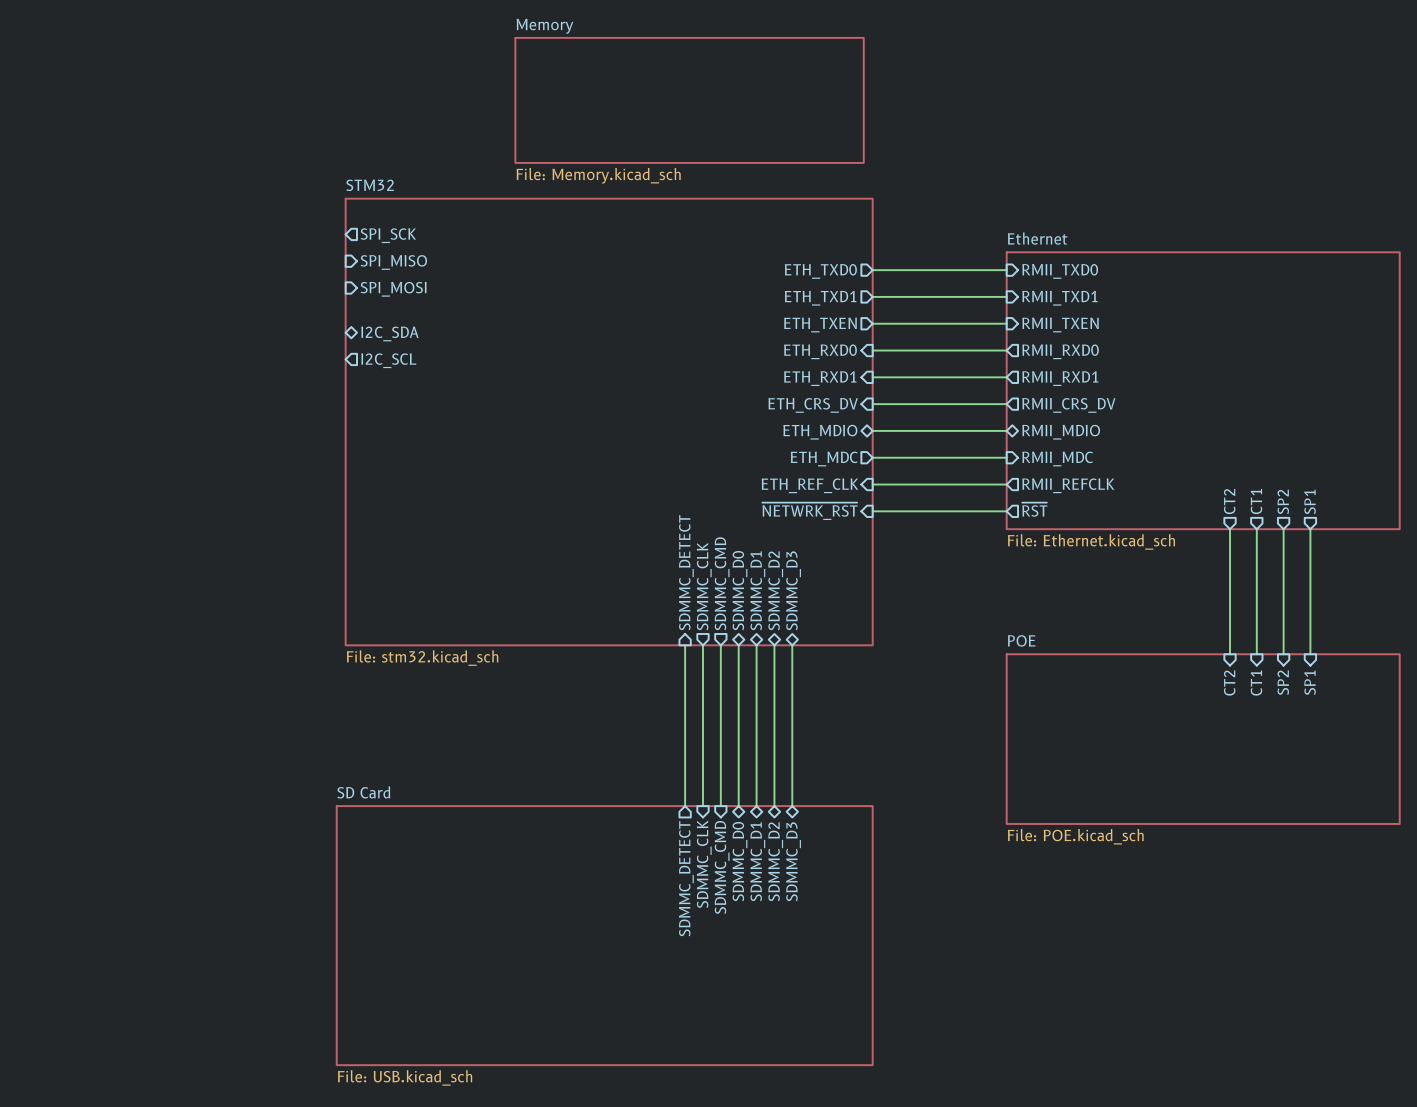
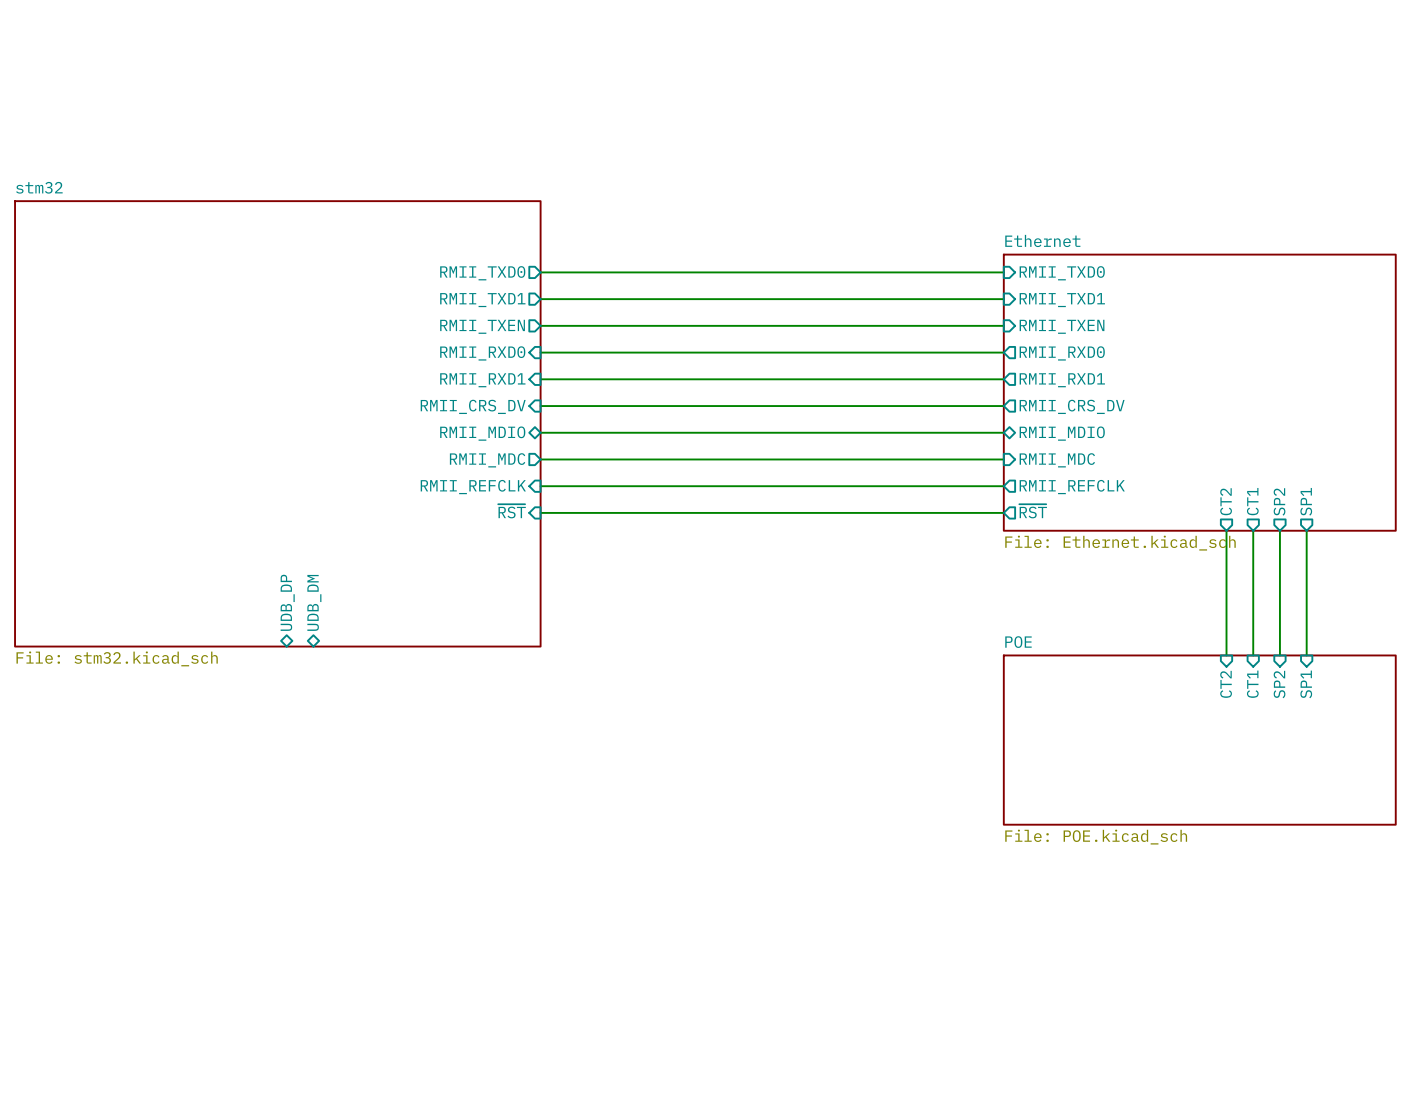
sheet Memory: File: Memory.kicad_sch (689, 100) -> none
sheet pin: SPI_SCK (388, 235) -> none
sheet pin: SPI_MISO (393, 262) -> none
wire: none -> (540, 272) (870, 272)
sheet pin: none -> RMII_TXD0 (482, 273)
sheet pin: ETH_TXD0 (820, 271) -> none
sheet pin: SPI_MOSI (393, 289) -> none
wire: none -> (540, 299) (870, 299)
sheet pin: none -> RMII_TXD1 (482, 300)
sheet pin: ETH_TXD1 (820, 298) -> none
wire: none -> (540, 325) (870, 325)
sheet pin: none -> RMII_TXEN (482, 326)
sheet pin: ETH_TXEN (820, 325) -> none
sheet pin: I2C_SDA (389, 333) -> none
wire: none -> (540, 352) (870, 352)
sheet pin: none -> RMII_RXD0 (482, 353)
sheet pin: ETH_RXD0 (820, 351) -> none
sheet pin: I2C_SCL (388, 360) -> none
wire: none -> (540, 379) (870, 379)
sheet pin: none -> RMII_RXD1 (482, 380)
sheet pin: ETH_RXD1 (820, 378) -> none
wire: none -> (540, 406) (870, 406)
sheet pin: none -> RMII_CRS_DV (473, 406)
sheet pin: ETH_CRS_DV (813, 405) -> none
sheet stm32: none -> File: stm32.kicad_sch (277, 423)
sheet STM32: File: stm32.kicad_sch (609, 422) -> none
wire: none -> (540, 432) (870, 432)
sheet pin: none -> RMII_MDIO (482, 433)
sheet pin: ETH_MDIO (820, 432) -> none
wire: none -> (540, 459) (870, 459)
sheet pin: none -> RMII_MDC (487, 460)
sheet pin: ETH_MDC (824, 459) -> none
wire: none -> (540, 486) (870, 486)
sheet pin: none -> RMII_REFCLK (473, 487)
sheet pin: ETH_REF_CLK (809, 485) -> none
sheet pin: none -> ~{RST} (512, 511)
wire: none -> (540, 512) (870, 512)
sheet pin: ~{NETWRK_RST} (810, 511) -> none
sheet pin: SDMMC_DETECT (686, 572) -> none
sheet pin: SDMMC_CMD (722, 583) -> none
sheet pin: SDMMC_CLK (704, 586) -> none
sheet pin: SDMMC_D0 (739, 590) -> none
sheet pin: SDMMC_D1 (757, 590) -> none
sheet pin: SDMMC_D2 (775, 590) -> none
sheet pin: SDMMC_D3 (793, 590) -> none
sheet pin: none -> UDB_DM (314, 602)
sheet pin: none -> UDB_DP (287, 602)
wire: (685, 645) (685, 806) -> none
wire: (702, 645) (702, 806) -> none
wire: (720, 645) (720, 806) -> none
wire: (738, 645) (738, 806) -> none
wire: (756, 645) (756, 806) -> none
wire: (774, 645) (774, 806) -> none
wire: (792, 645) (792, 806) -> none
sheet pin: SDMMC_D0 (739, 861) -> none
sheet pin: SDMMC_D1 (757, 861) -> none
sheet pin: SDMMC_D2 (775, 861) -> none
sheet pin: SDMMC_D3 (793, 861) -> none
sheet pin: SDMMC_CLK (704, 864) -> none
sheet pin: SDMMC_CMD (722, 867) -> none
sheet pin: SDMMC_DETECT (686, 878) -> none
sheet SD Card: File: USB.kicad_sch (604, 935) -> none

